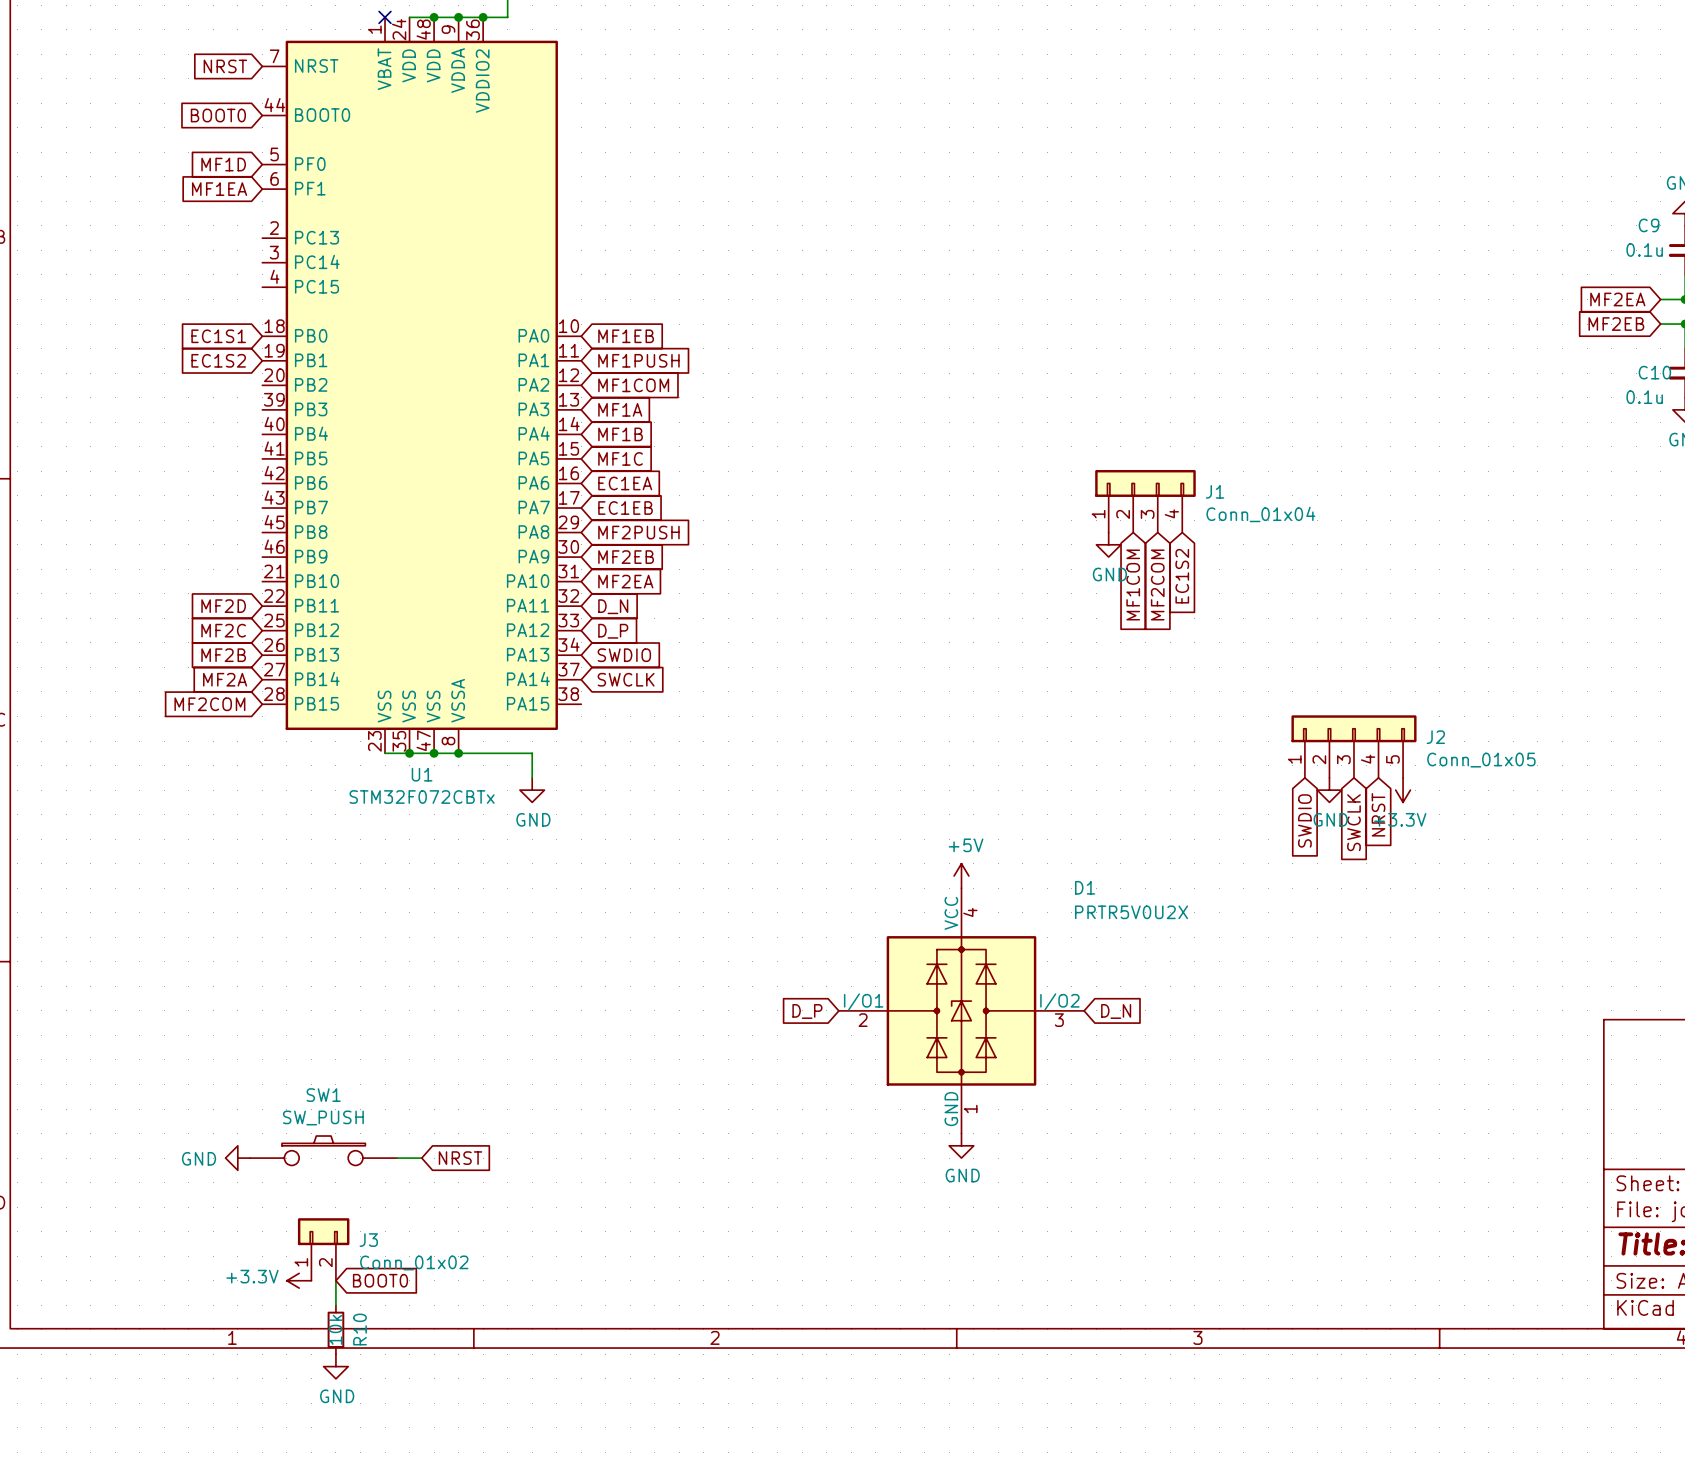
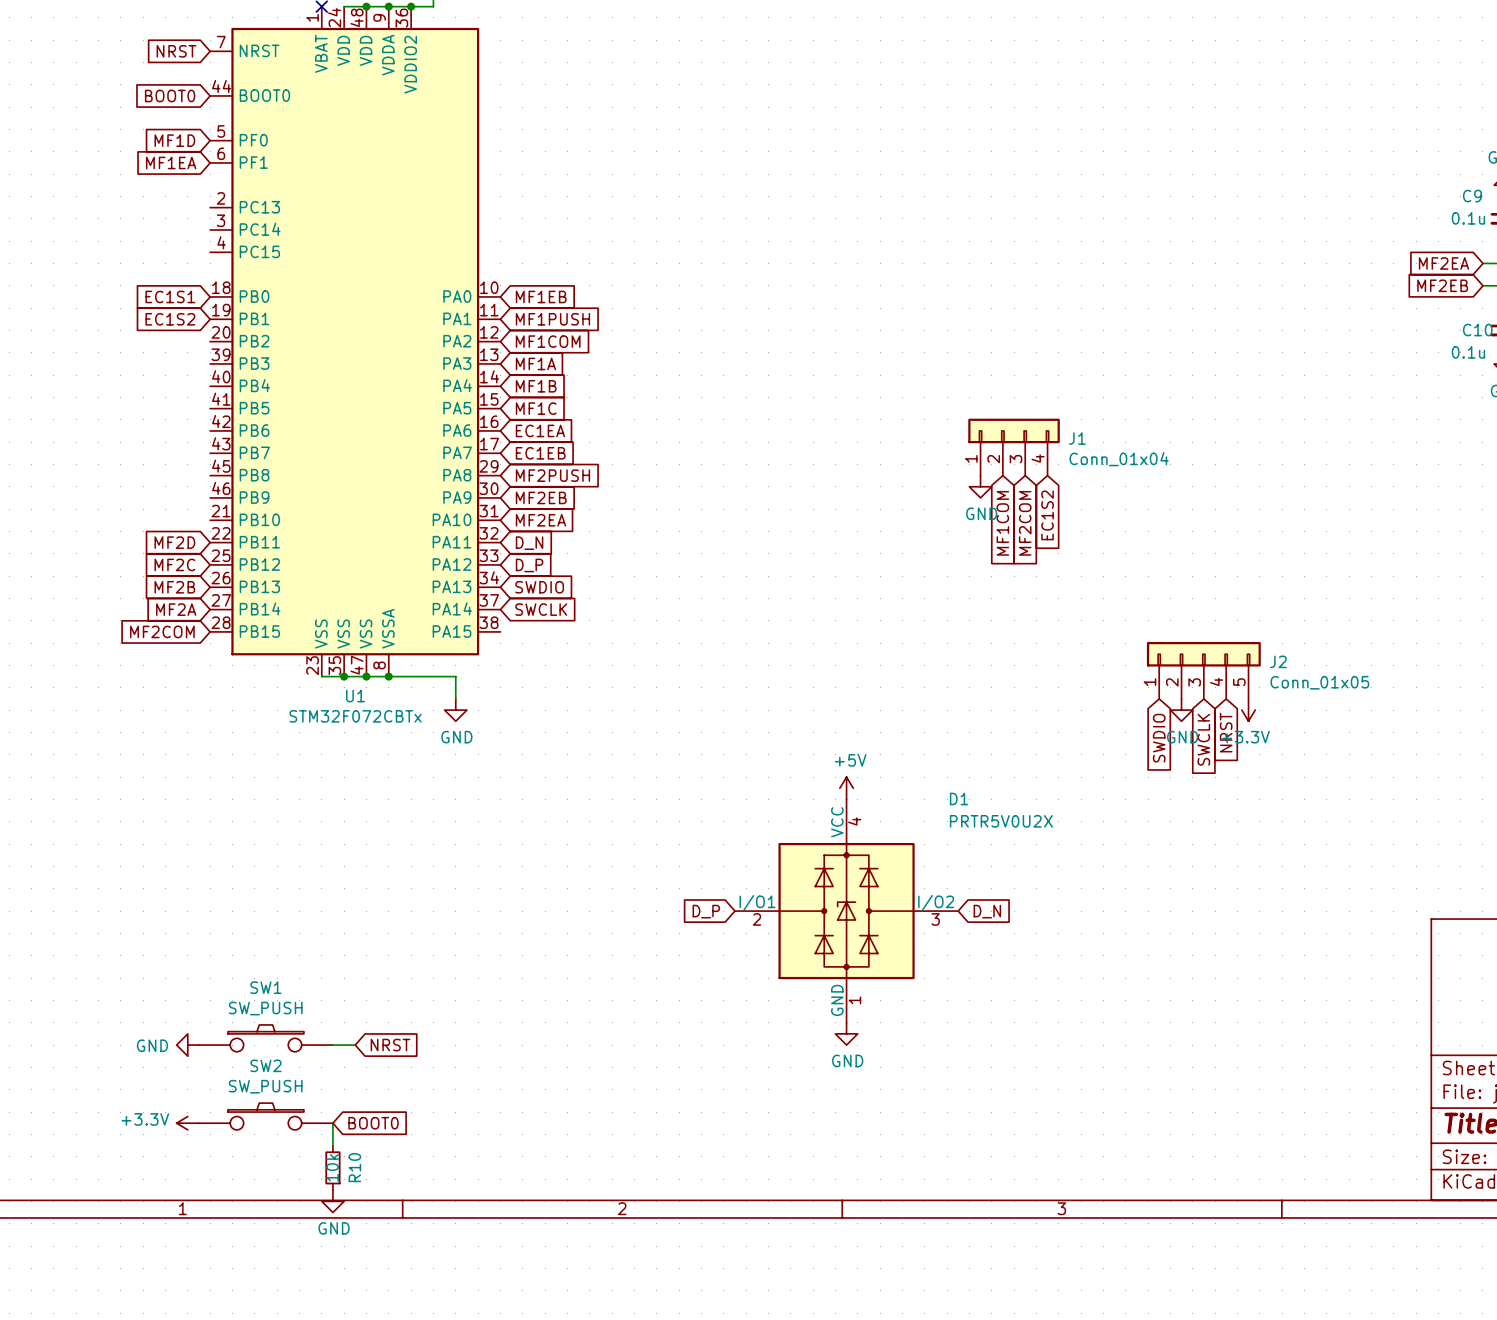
SW2: none -> SW_PUSH (265, 1116)
J3: Conn_01x02 (323, 1249) -> none
power symbol position: +3.3V (299, 1280) -> +3.3V (187, 1123)
wire: (335, 1280) (335, 1305) -> (332, 1123) (332, 1145)
global label position: BOOT0 (380, 1280) -> BOOT0 (373, 1123)
R10 position: (335, 1329) -> (332, 1167)
power symbol position: GND (335, 1366) -> GND (332, 1201)

